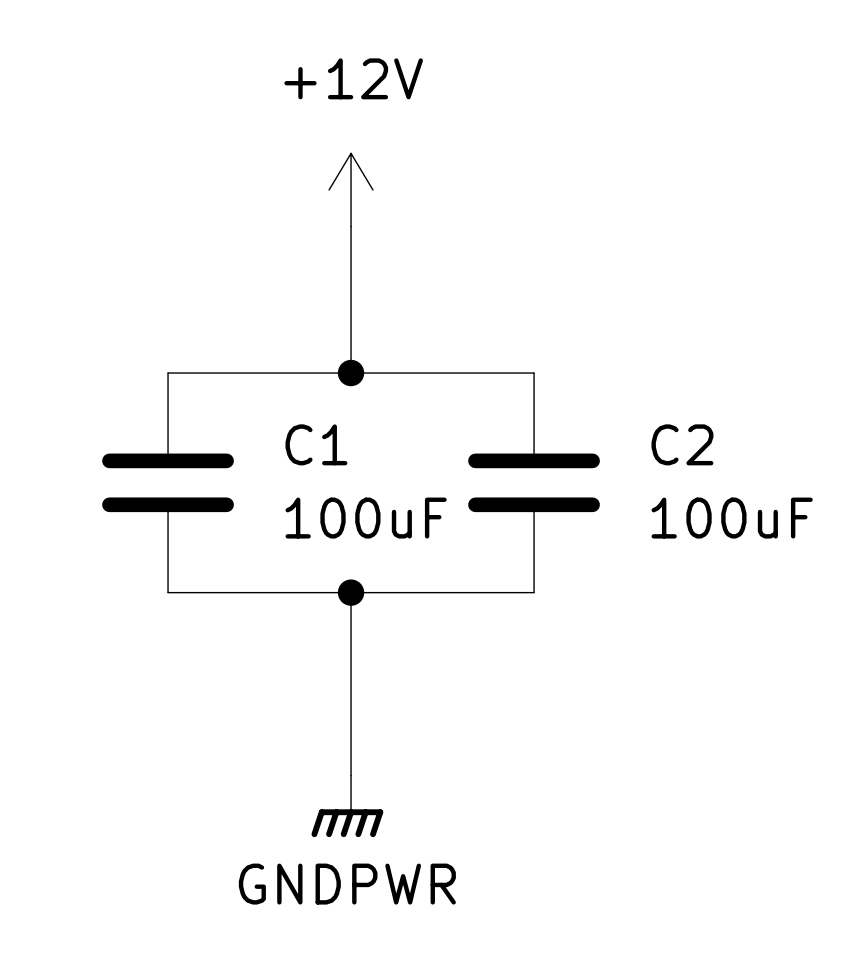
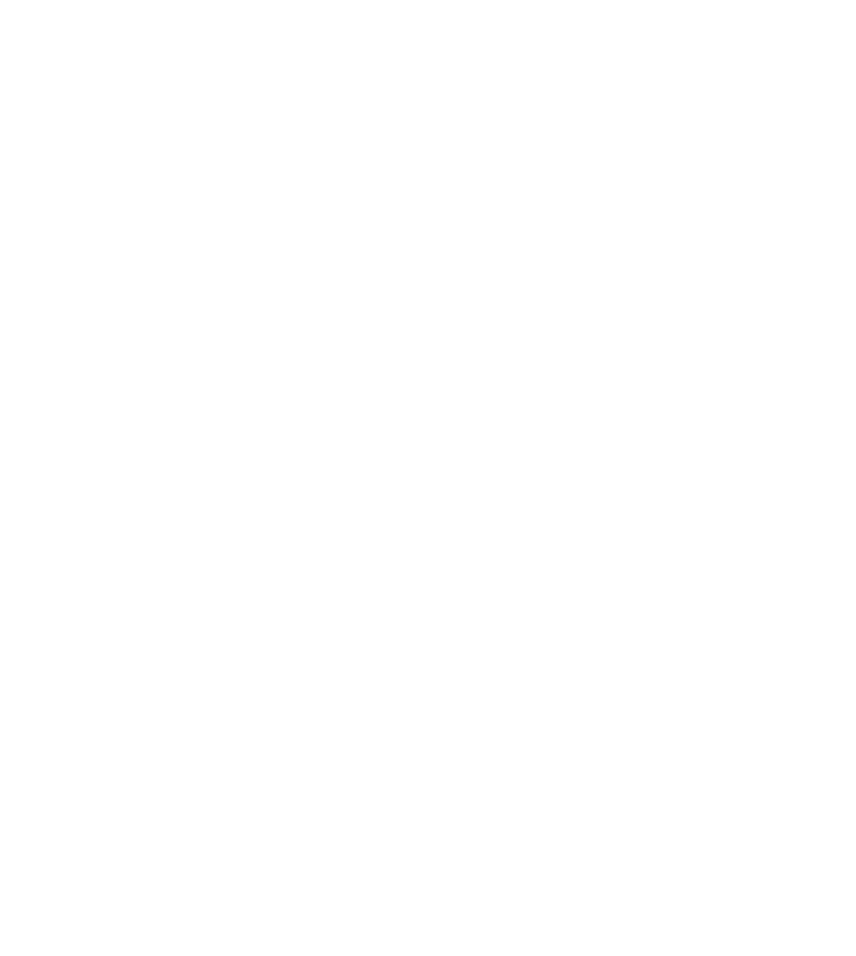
power symbol: +12V (351, 190) -> none
wire: (351, 226) (351, 373) -> none
wire: (168, 373) (534, 373) -> none
junction: (351, 373) -> none
C1: 100uF (168, 482) -> none
C2: 100uF (534, 482) -> none
wire: (168, 592) (534, 592) -> none
wire: (351, 592) (351, 775) -> none
junction: (351, 592) -> none
power symbol: GNDPWR (347, 806) -> none

